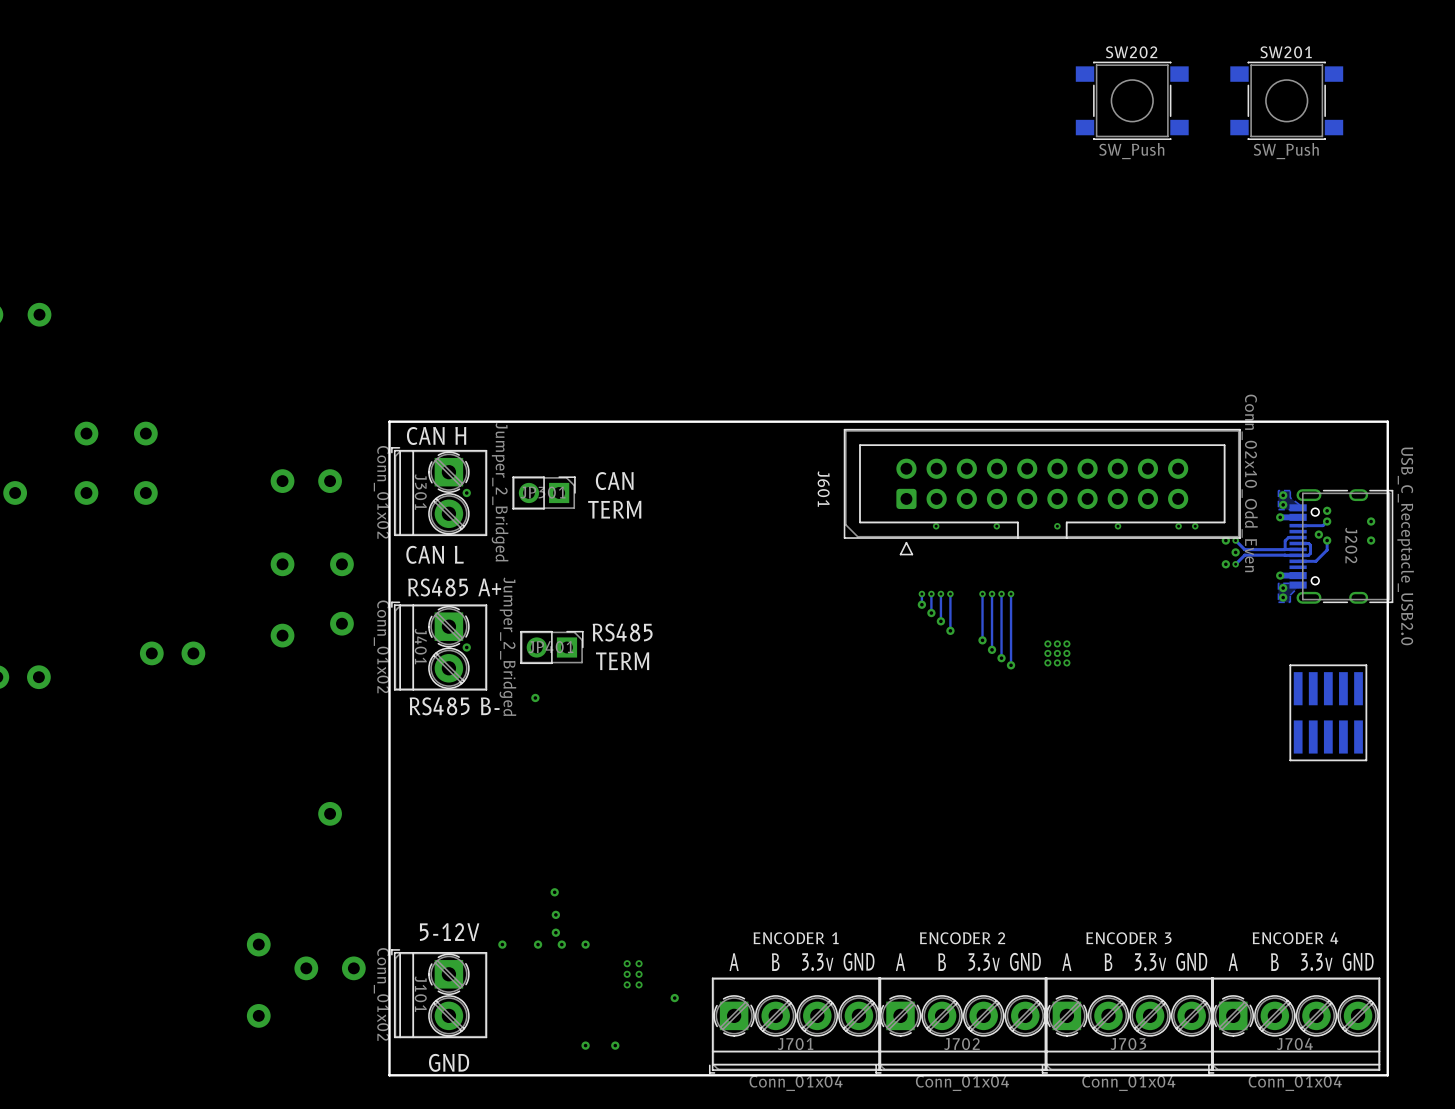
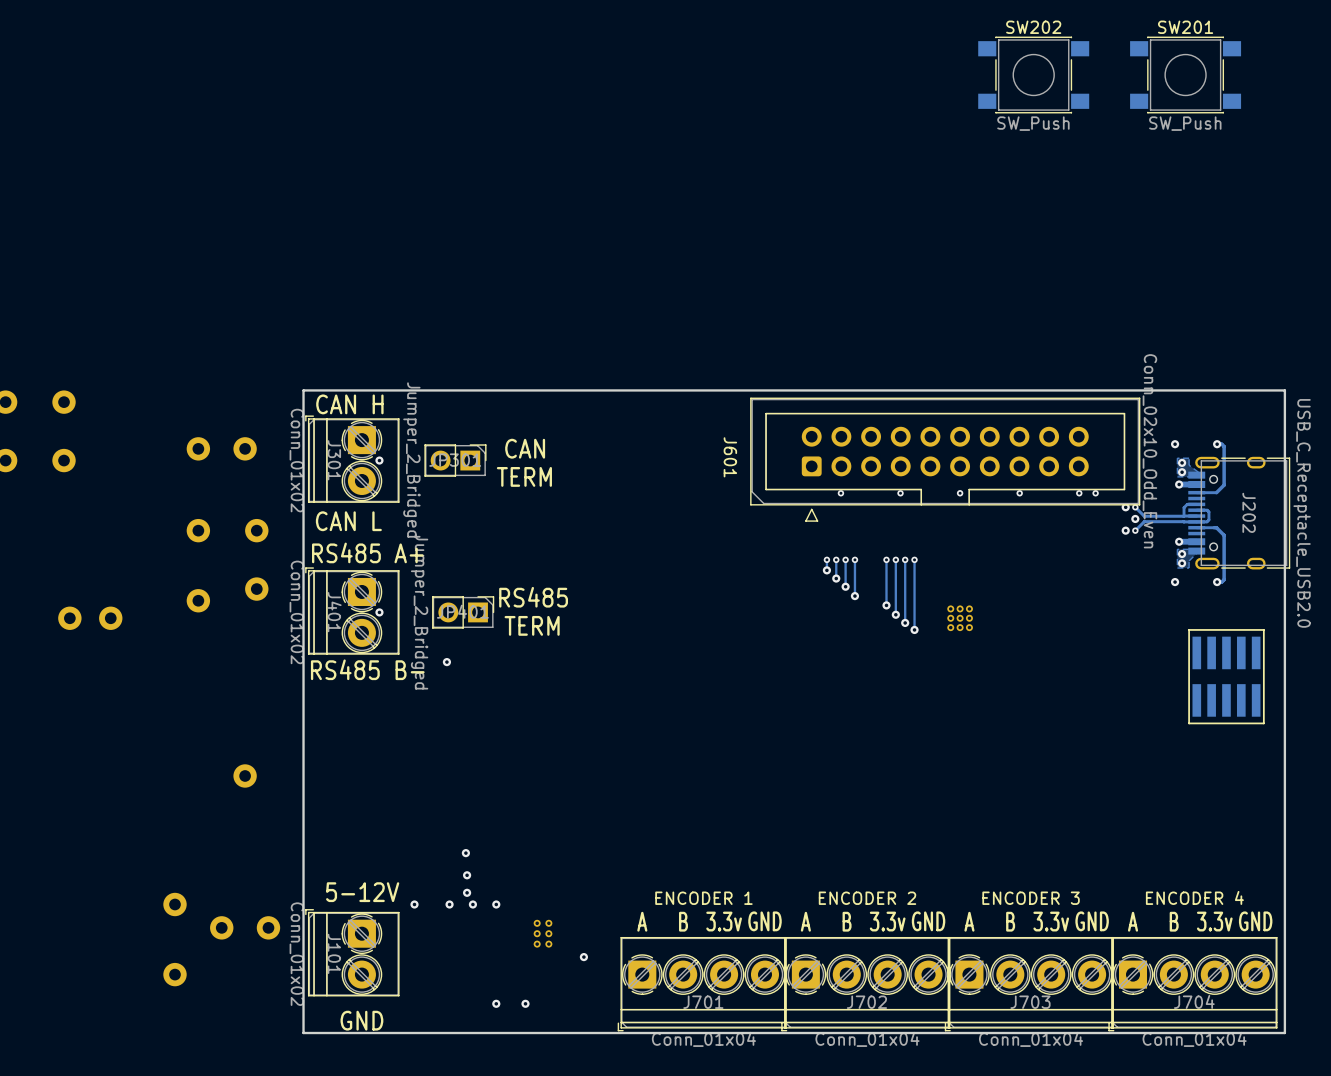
via: none -> (1175, 444)
via: none -> (1217, 444)
via: (1327, 510) -> none
track: (1327, 521) (1322, 525) (1318, 525) -> (1217, 444) (1224, 446) (1224, 485) (1216, 492)
via: (1327, 521) -> none
via: (1371, 521) -> none
via: (1318, 534) -> none
track: (1327, 540) (1327, 550) (1315, 561) -> (1217, 582) (1224, 579) (1224, 535) (1214, 527)
via: (1327, 540) -> none
via: (1371, 540) -> none
via: none -> (1175, 582)
via: none -> (1217, 582)

